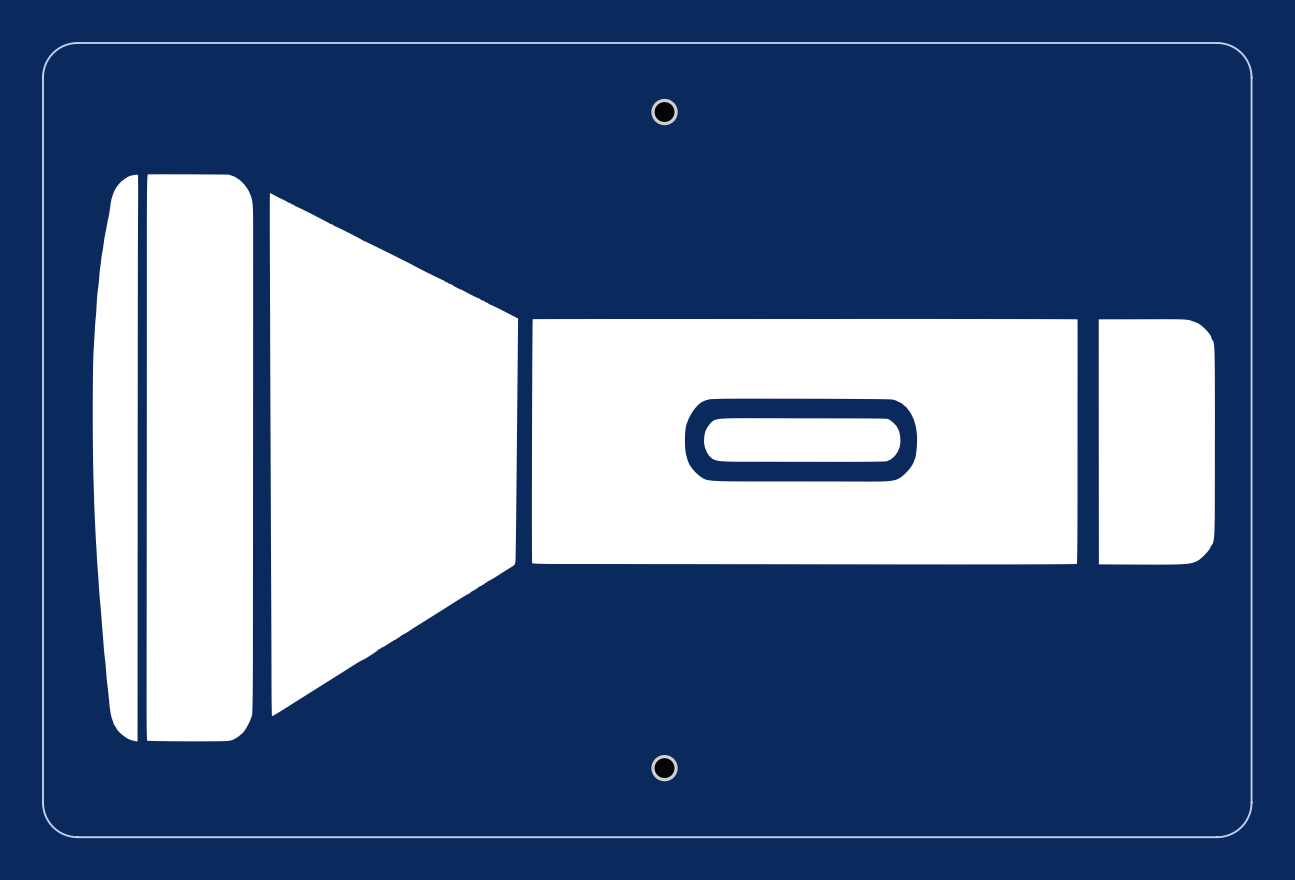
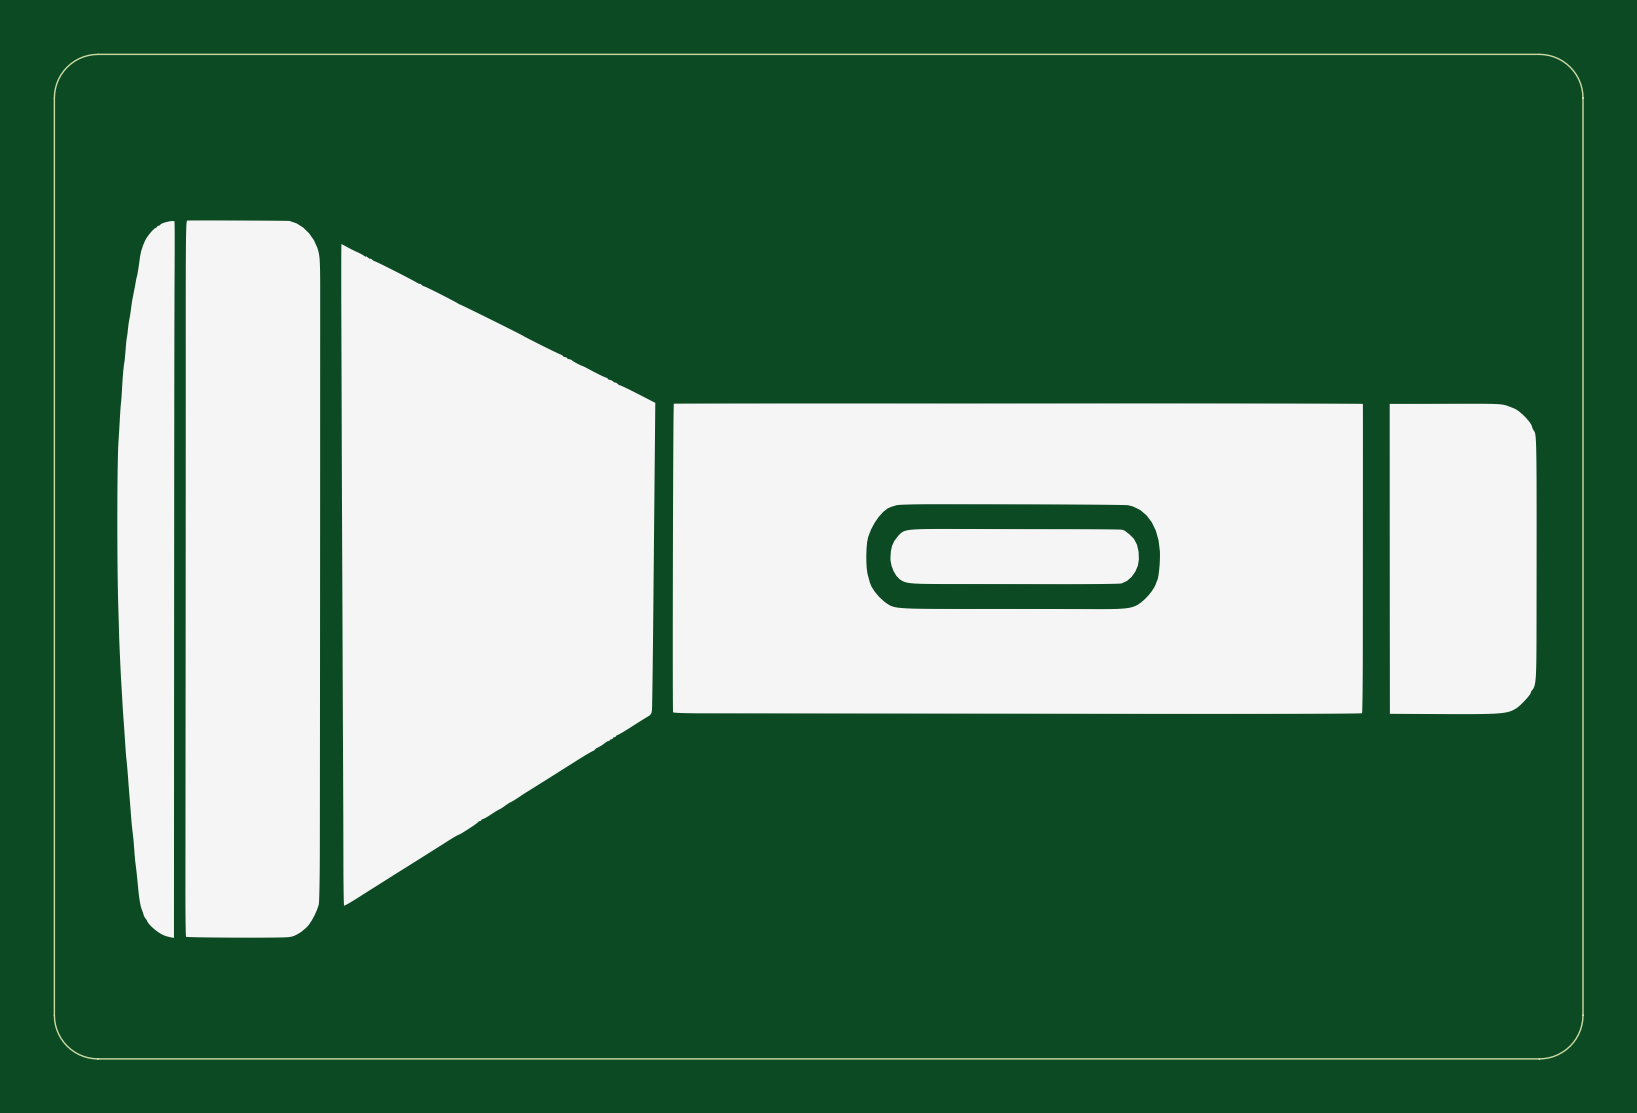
part: (664, 112) -> none
part: (664, 768) -> none

